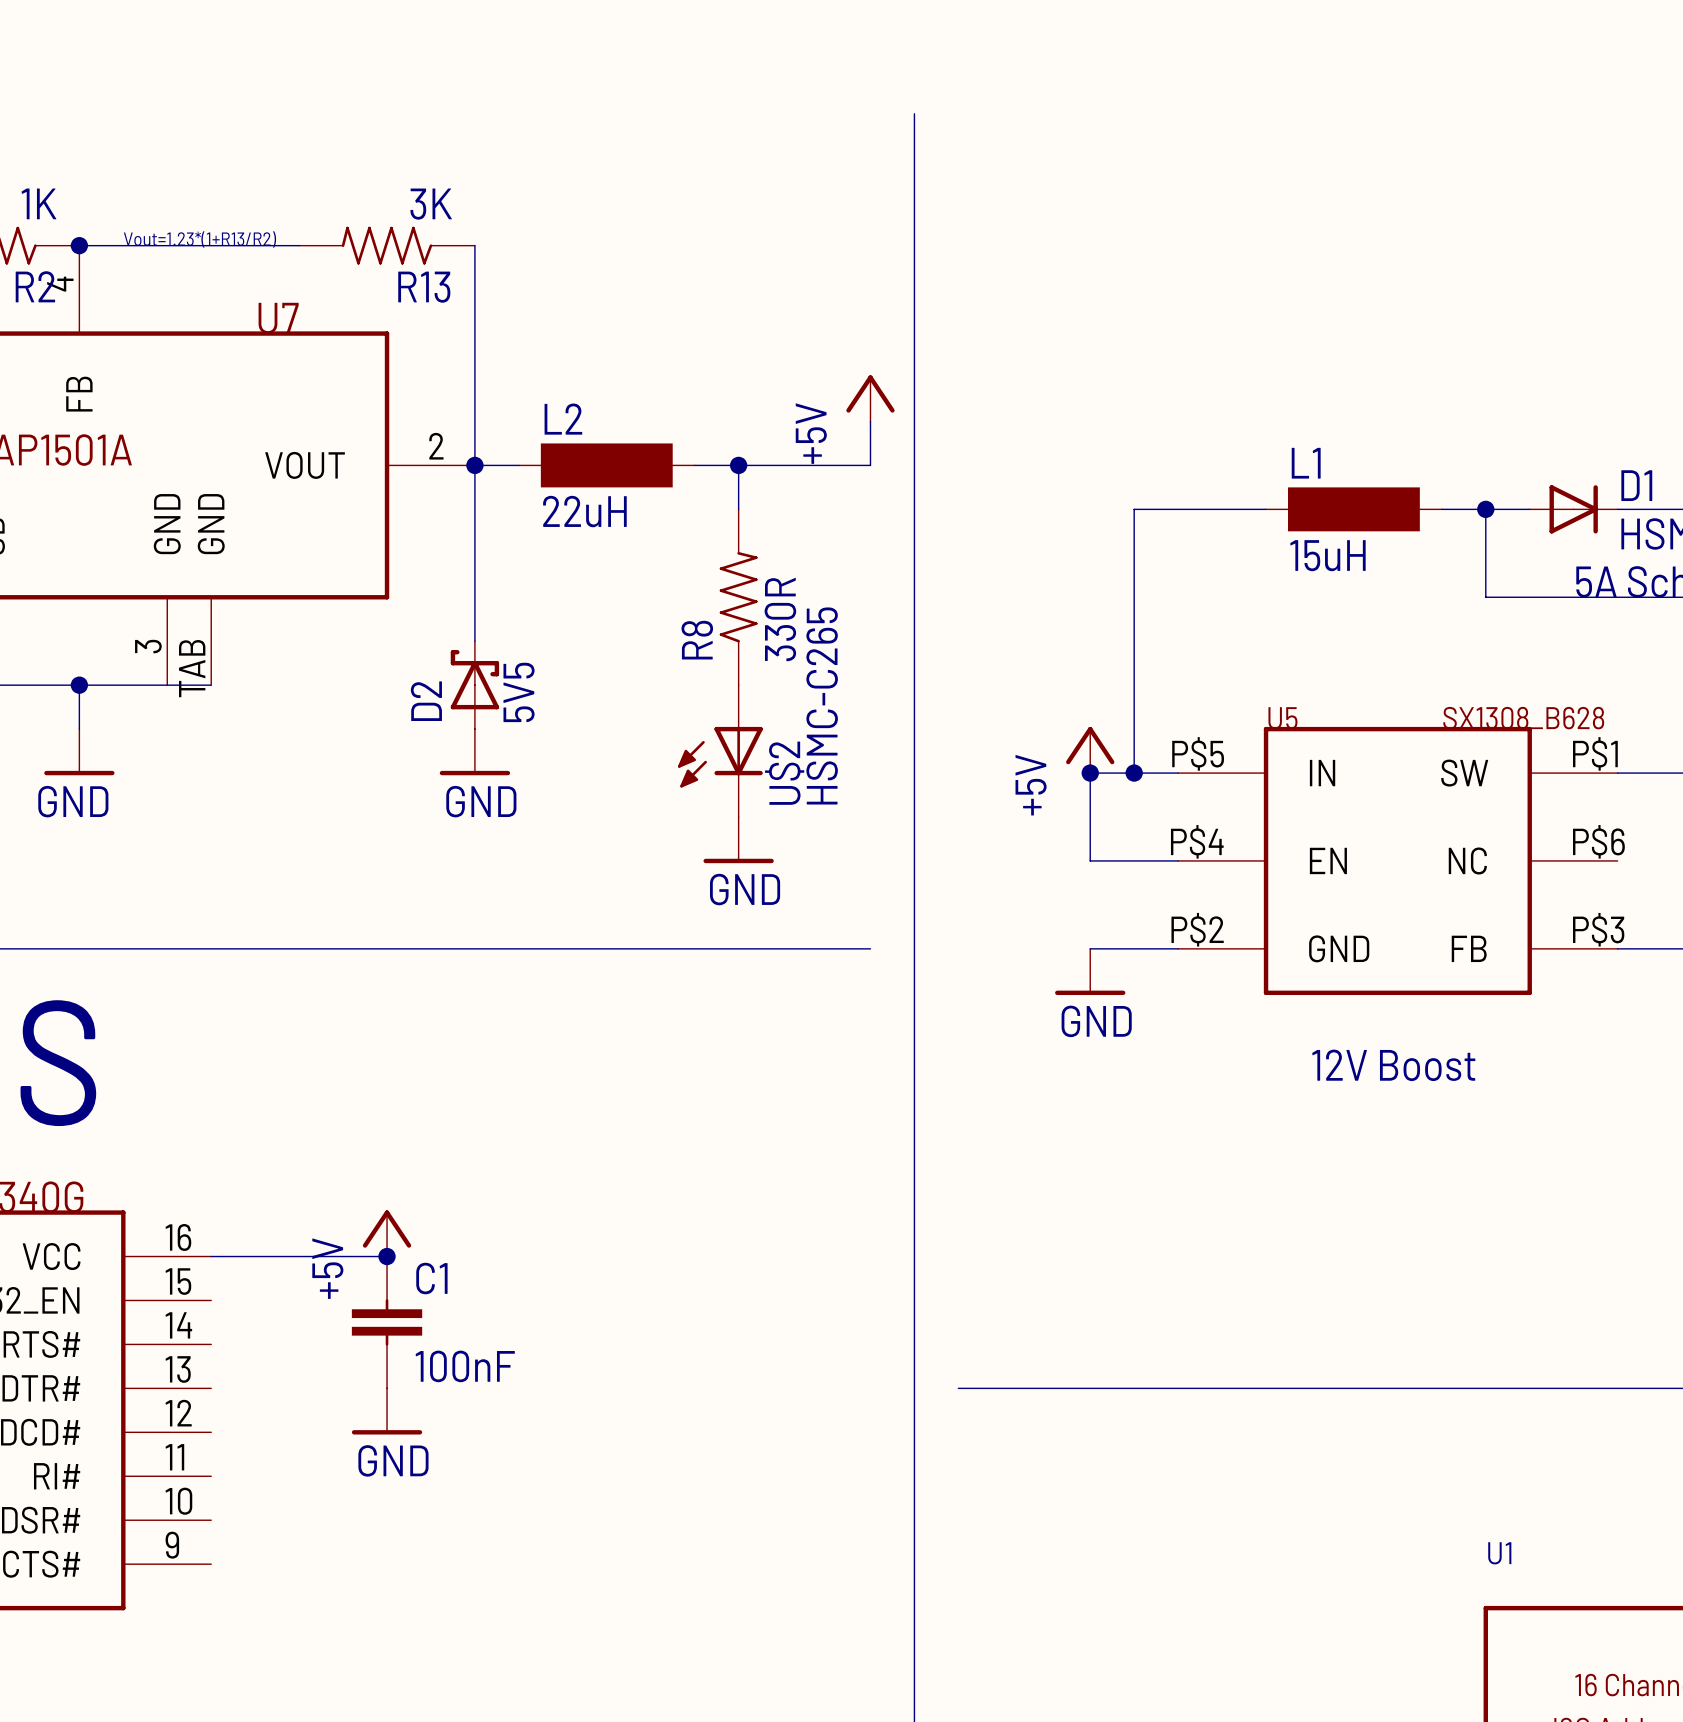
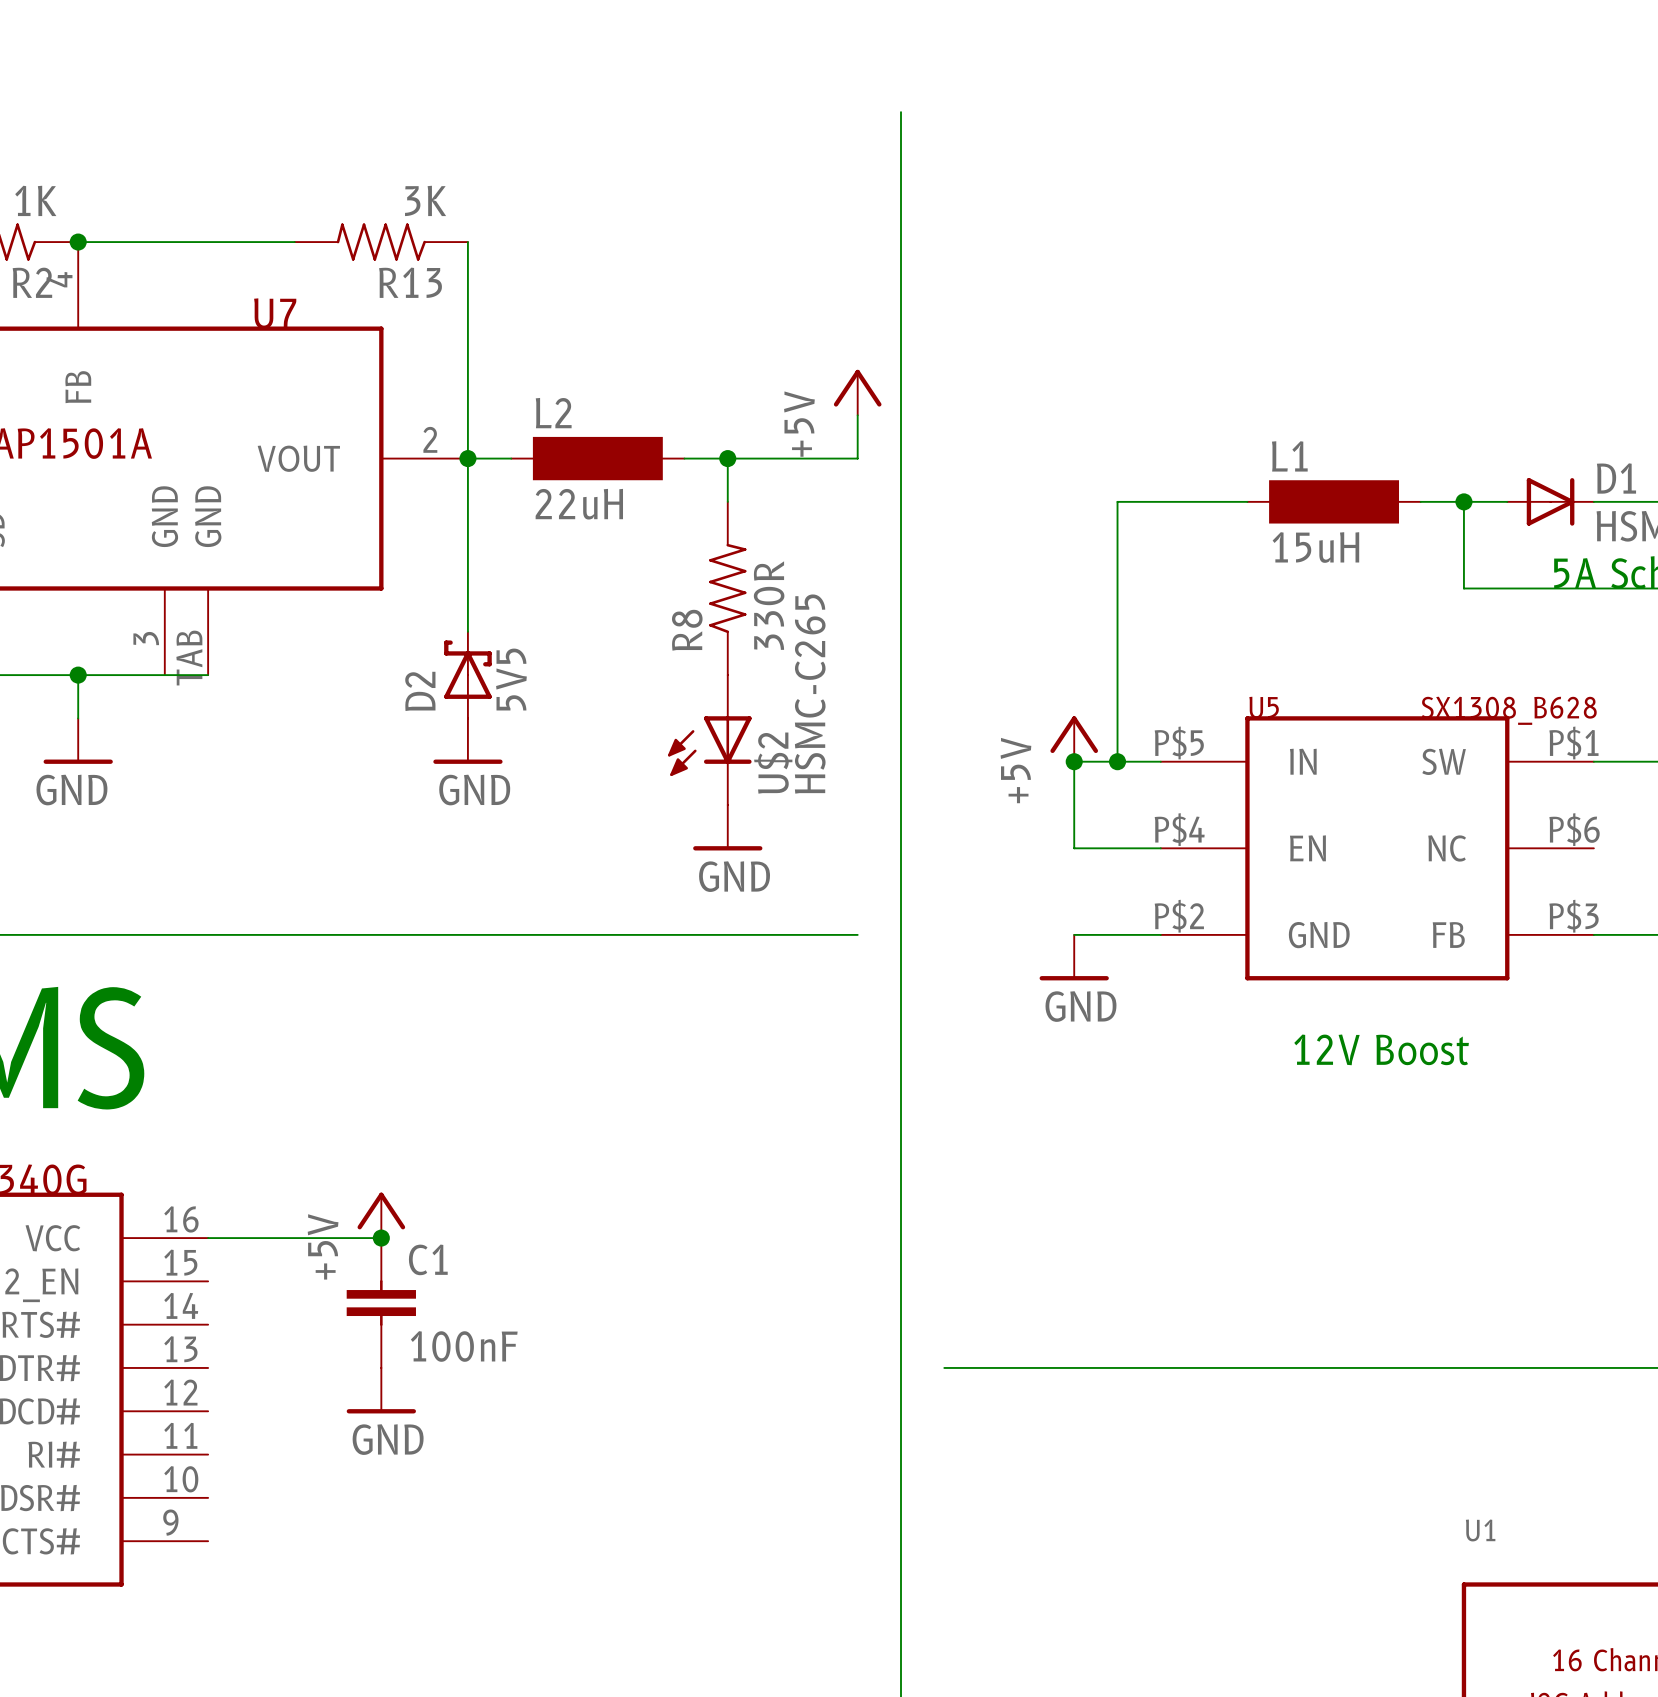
text: Vout=1.23*(1+R13/R2) (199, 239) -> none

